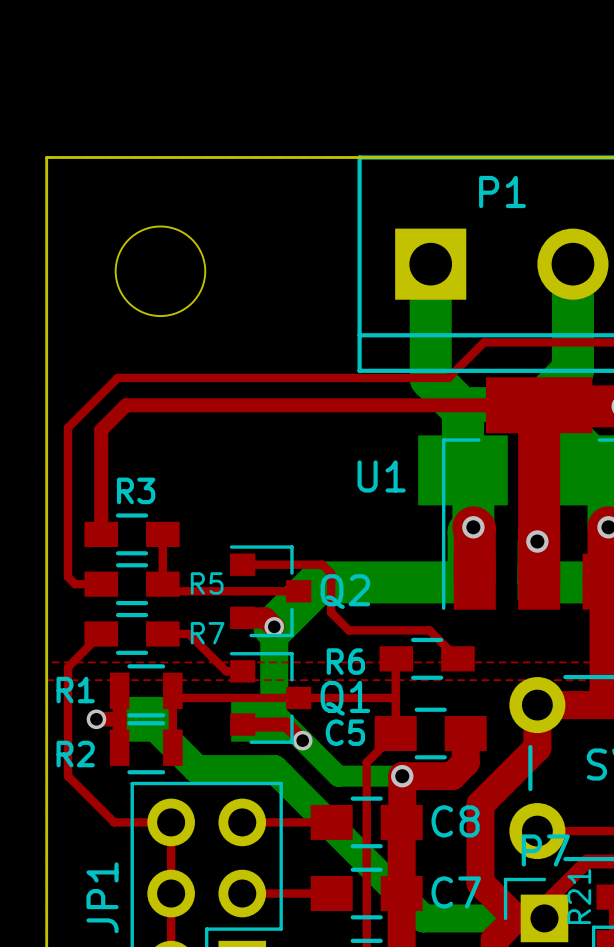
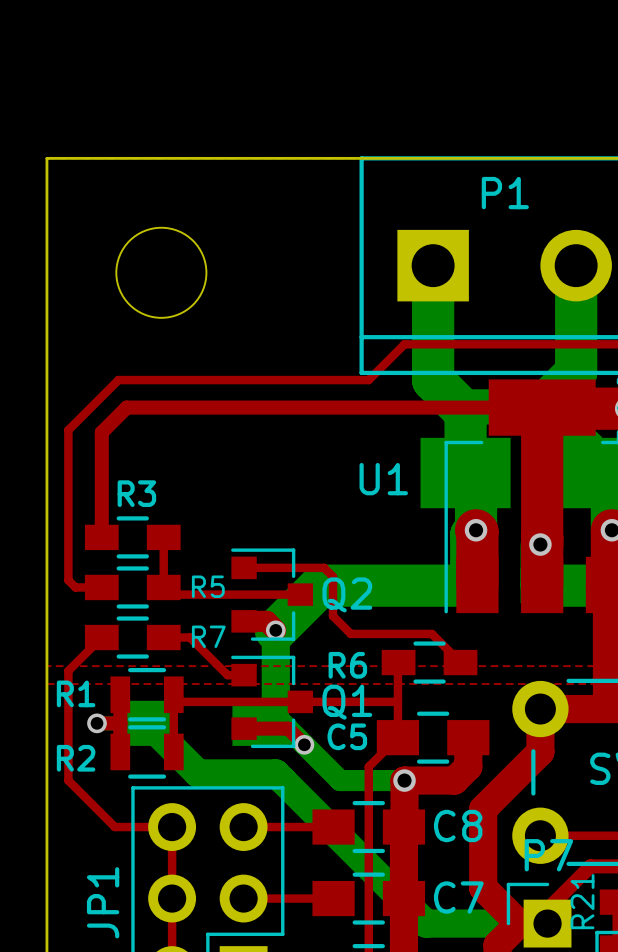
top track: (484, 342) (448, 377) (366, 377) -> (486, 344) (404, 344) (368, 380)

